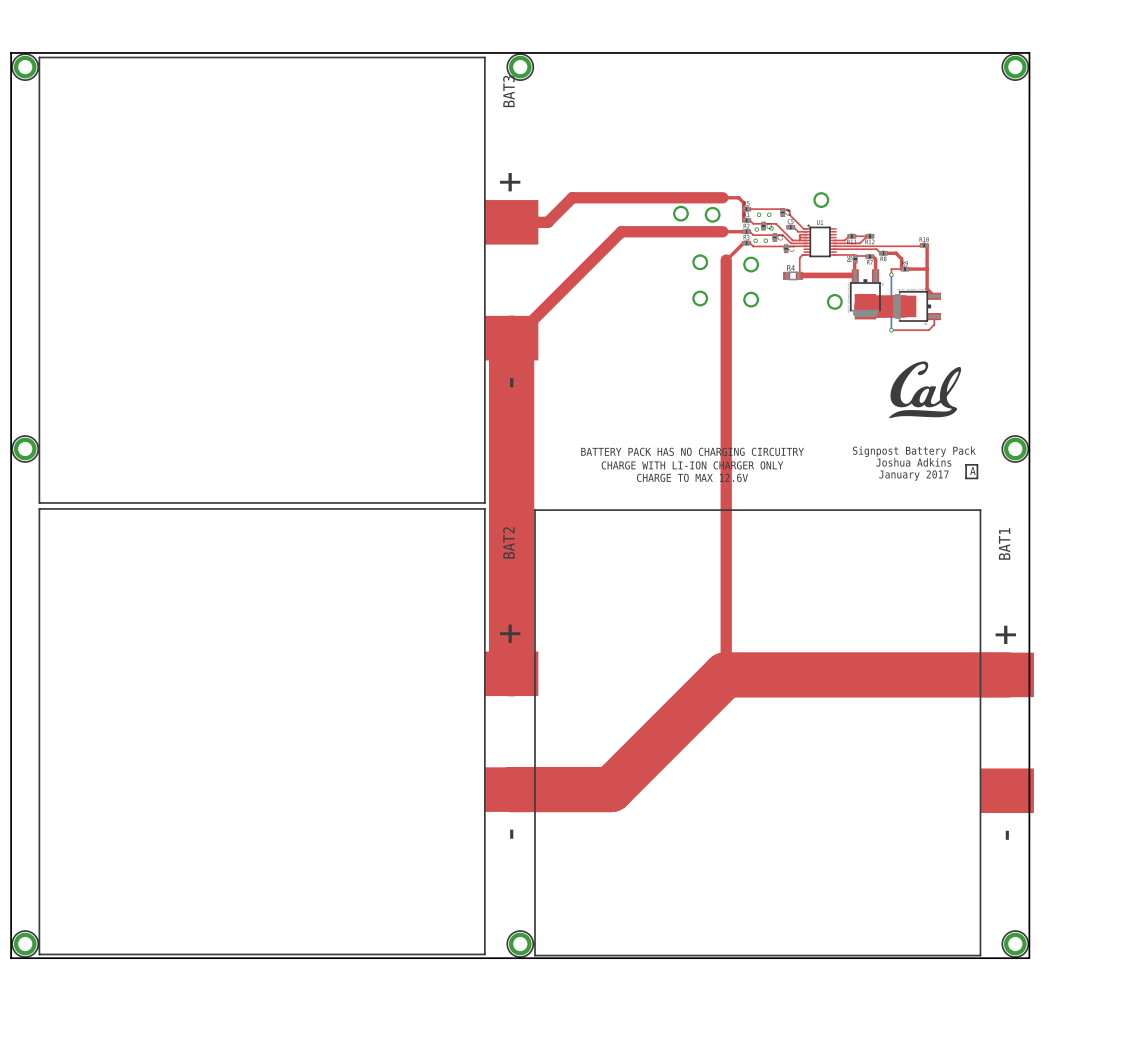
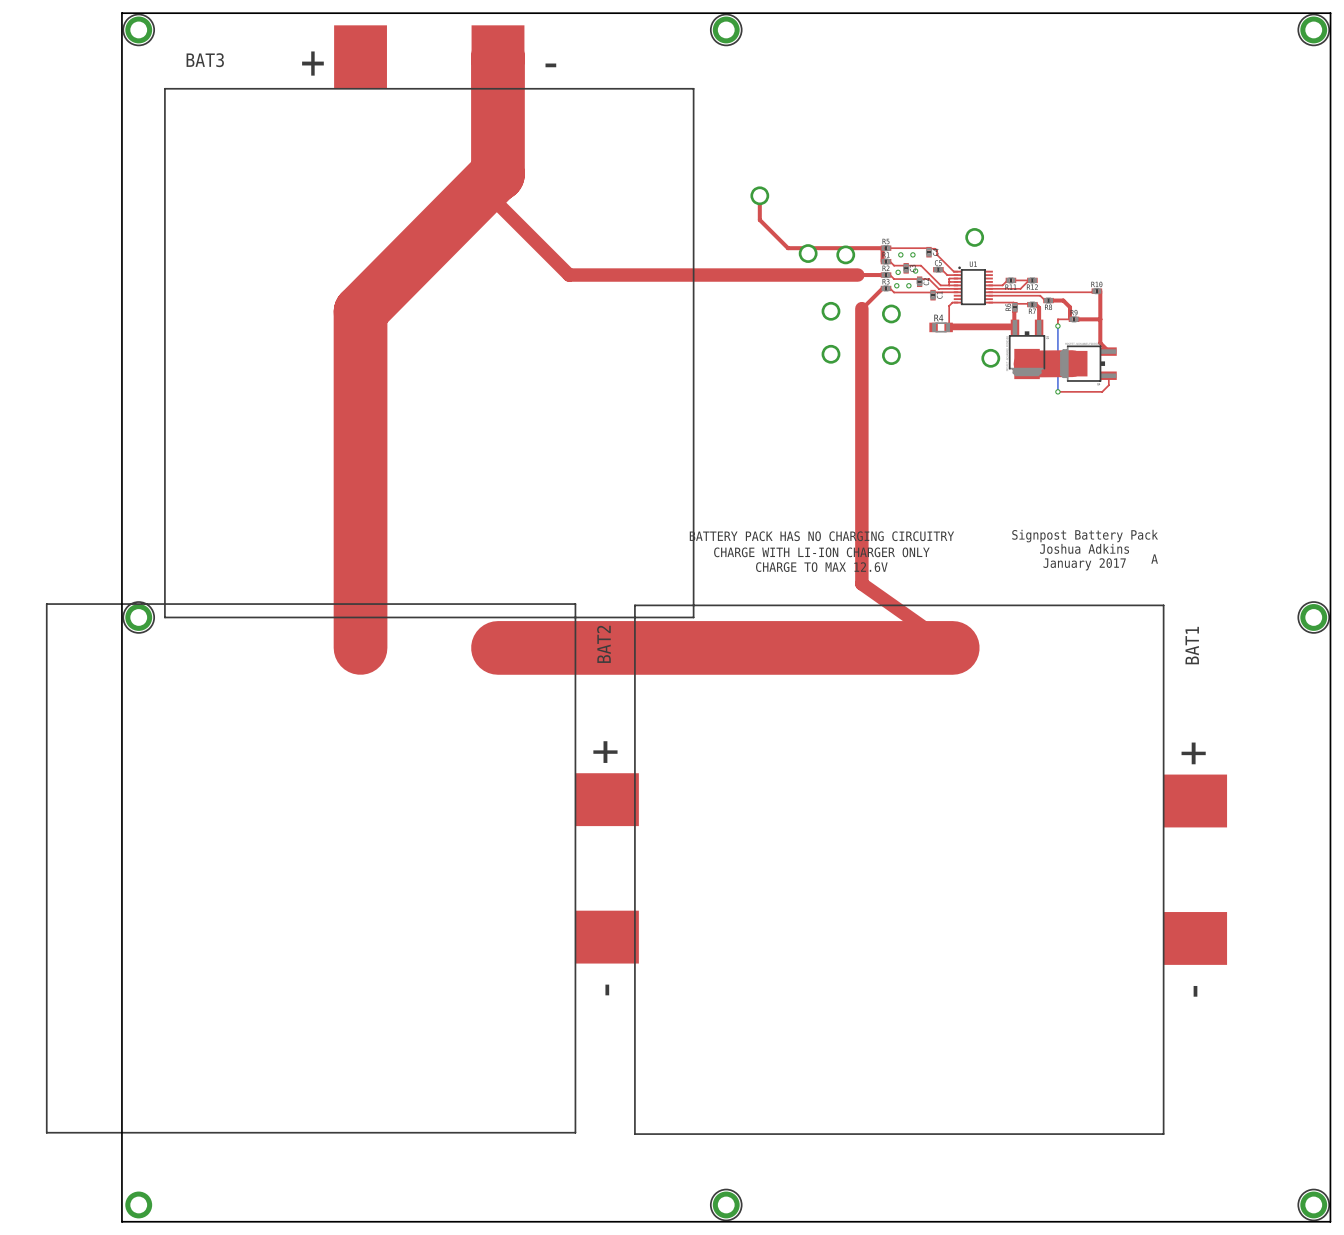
via: none -> (138, 29)
via: none -> (726, 29)
via: none -> (1313, 29)
top track: none -> (497, 57) (497, 174) (493, 177)
board edge: (11, 52) (1029, 52) (1029, 958) (11, 958) (11, 52) -> (121, 13) (121, 1221) (1330, 1221) (1330, 13) (121, 13)
BAT3 footprint: [39, 57, 539, 504] -> [164, 25, 694, 618]
drawing position: (25, 67) -> (138, 29)
via: (25, 67) -> none
drawing position: (520, 67) -> (726, 29)
via: (520, 67) -> none
drawing position: (1015, 67) -> (1313, 29)
via: (1015, 67) -> none
BAT3 name position: BAT3 (508, 91) -> BAT3 (205, 60)
top track: none -> (493, 177) (360, 311) (360, 647)
via: none -> (759, 195)
top track: (743, 209) (743, 202) (738, 197) (572, 197) (547, 222) (511, 222) -> (882, 248) (788, 248) (759, 219) (759, 195)
top track: (621, 231) (511, 341) -> (737, 275) (569, 275) (484, 190) (484, 186) (493, 177)
top track: (511, 338) (511, 673) -> none
drawing: [889, 361, 962, 419] -> none
drawing: [11, 435, 39, 463] -> none
drawing: [1001, 435, 1029, 463] -> none
via: (25, 449) -> none
via: (1015, 449) -> none
line: (966, 464) (966, 478) (977, 478) (977, 464) (966, 464) -> none
top track: (726, 492) (726, 674) (723, 677) -> (861, 583) (952, 647) (497, 647)
drawing: none -> [122, 601, 155, 634]
drawing: none -> [1297, 601, 1330, 634]
via: none -> (138, 617)
via: none -> (1313, 617)
top track: (1007, 674) (725, 674) (610, 789) (511, 789) -> none
drawing: [11, 930, 39, 958] -> none
drawing: [506, 930, 534, 958] -> none
drawing: [1001, 930, 1029, 958] -> none
via: (25, 944) -> none
via: (520, 944) -> none
via: (1015, 944) -> none
drawing: none -> [710, 1188, 743, 1222]
drawing: none -> [1297, 1188, 1330, 1222]
via: none -> (138, 1204)
via: none -> (726, 1204)
via: none -> (1313, 1204)

